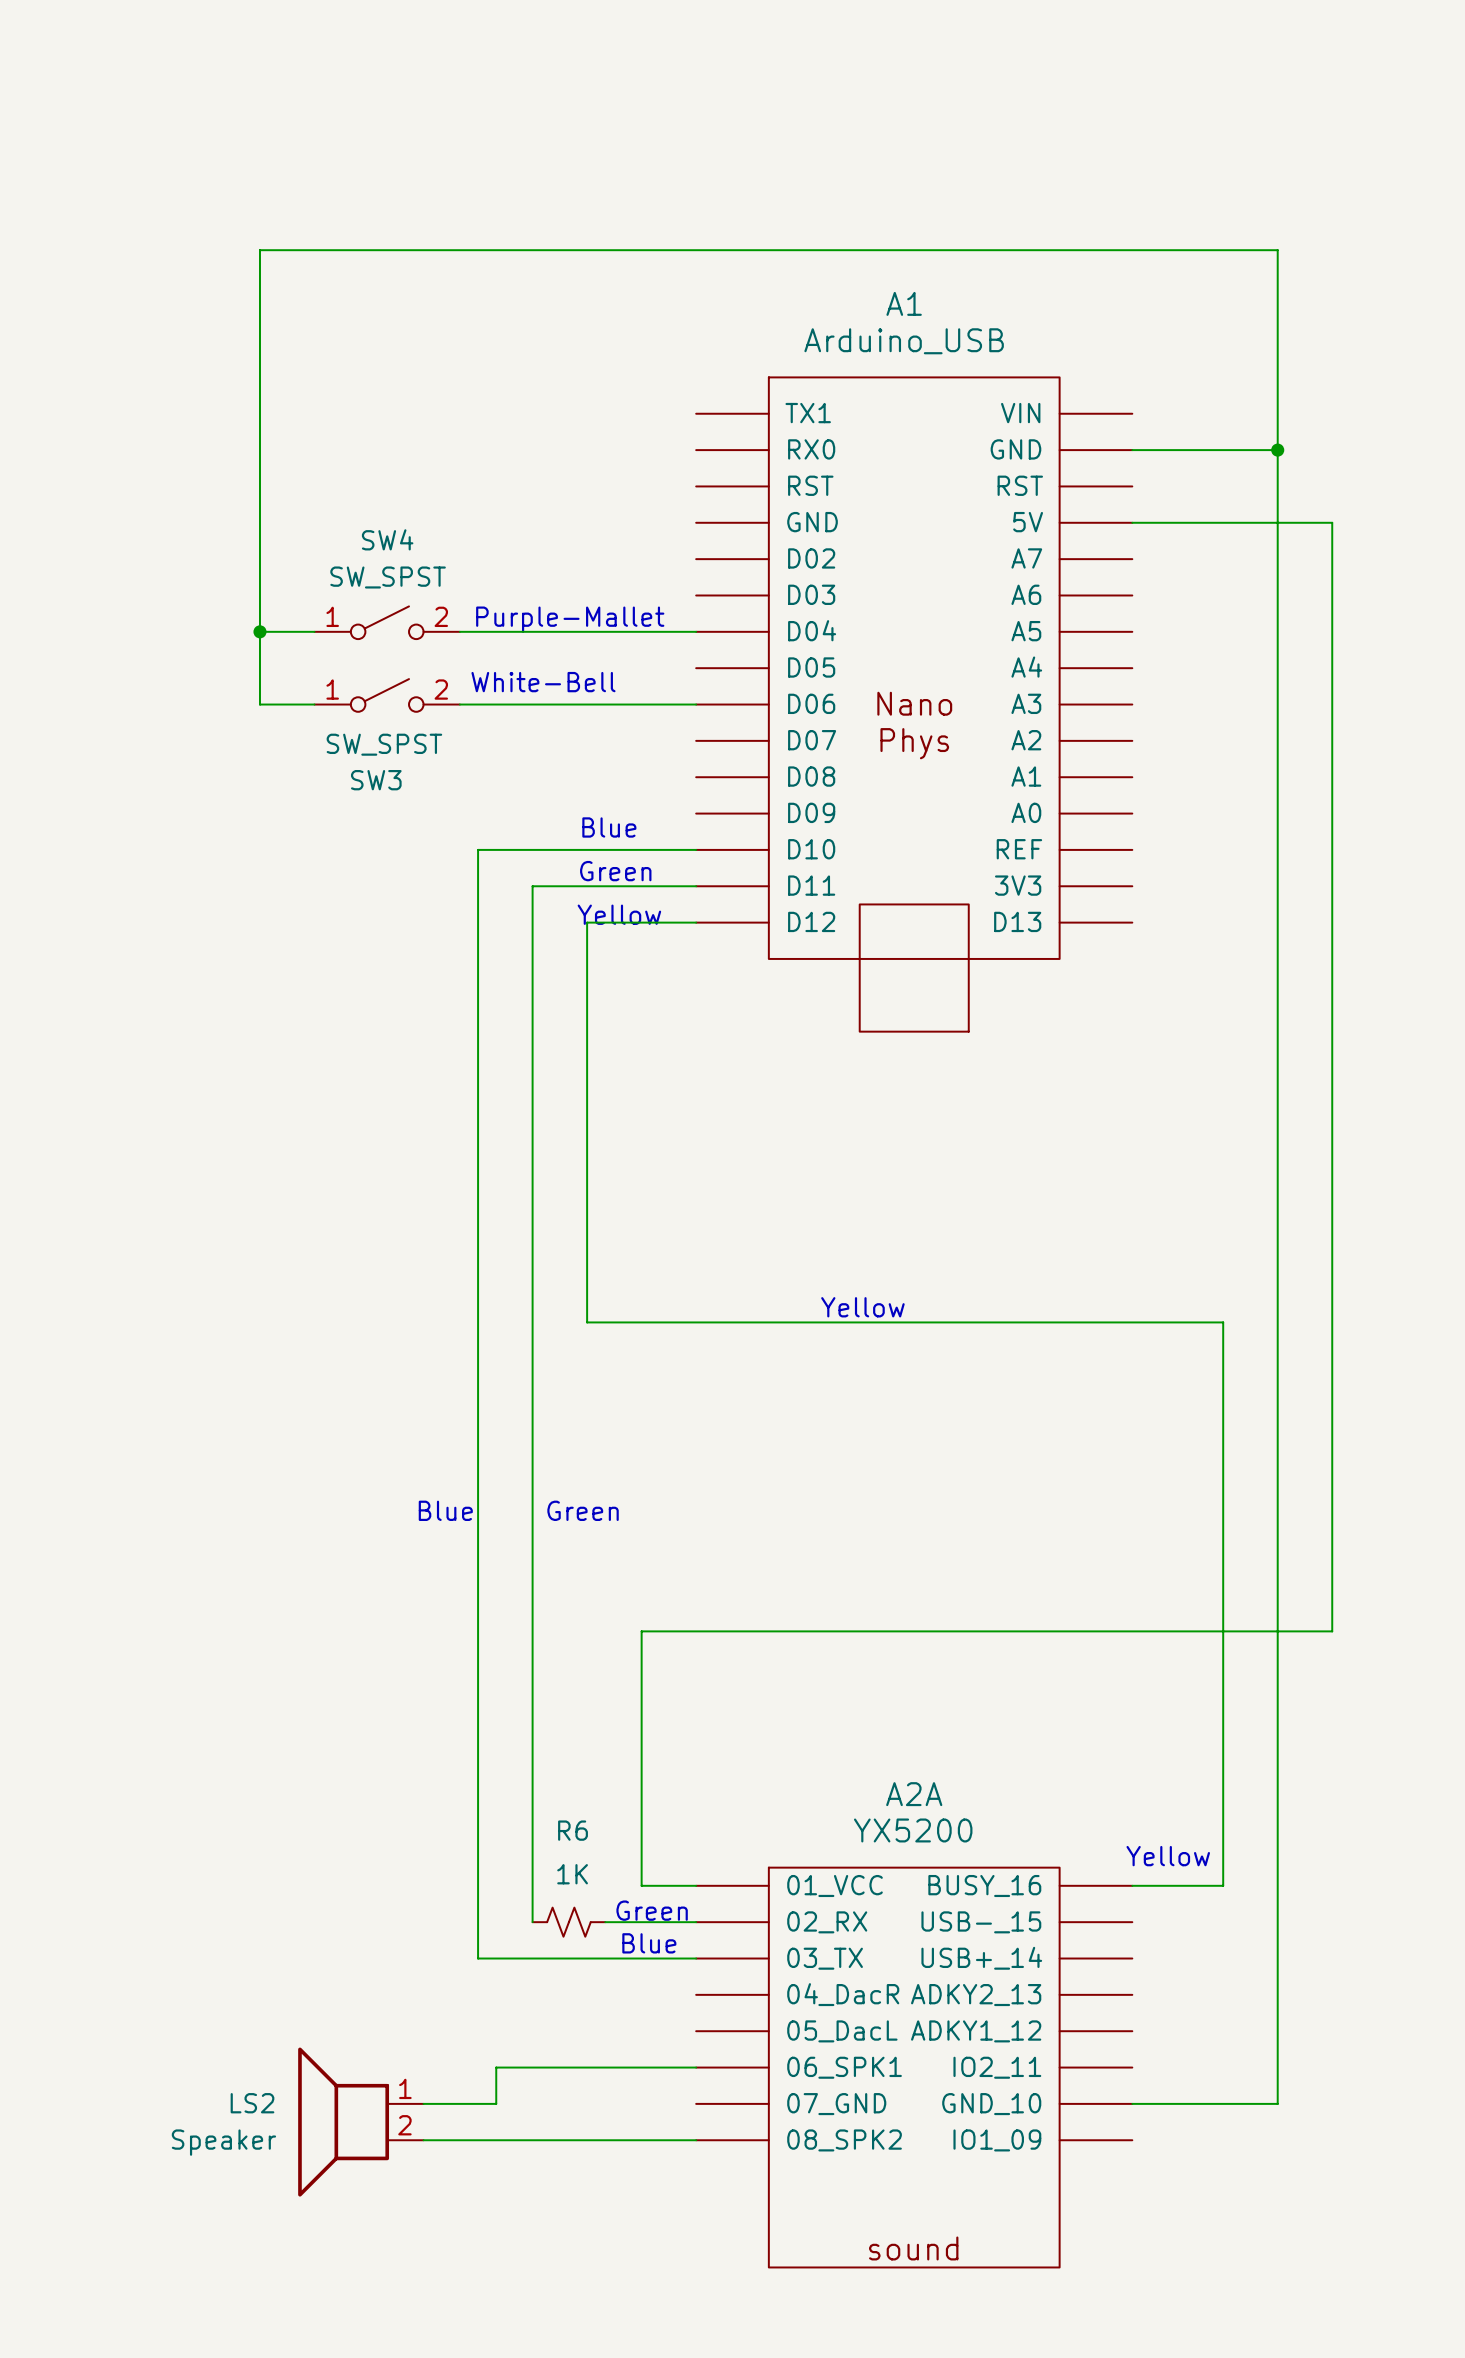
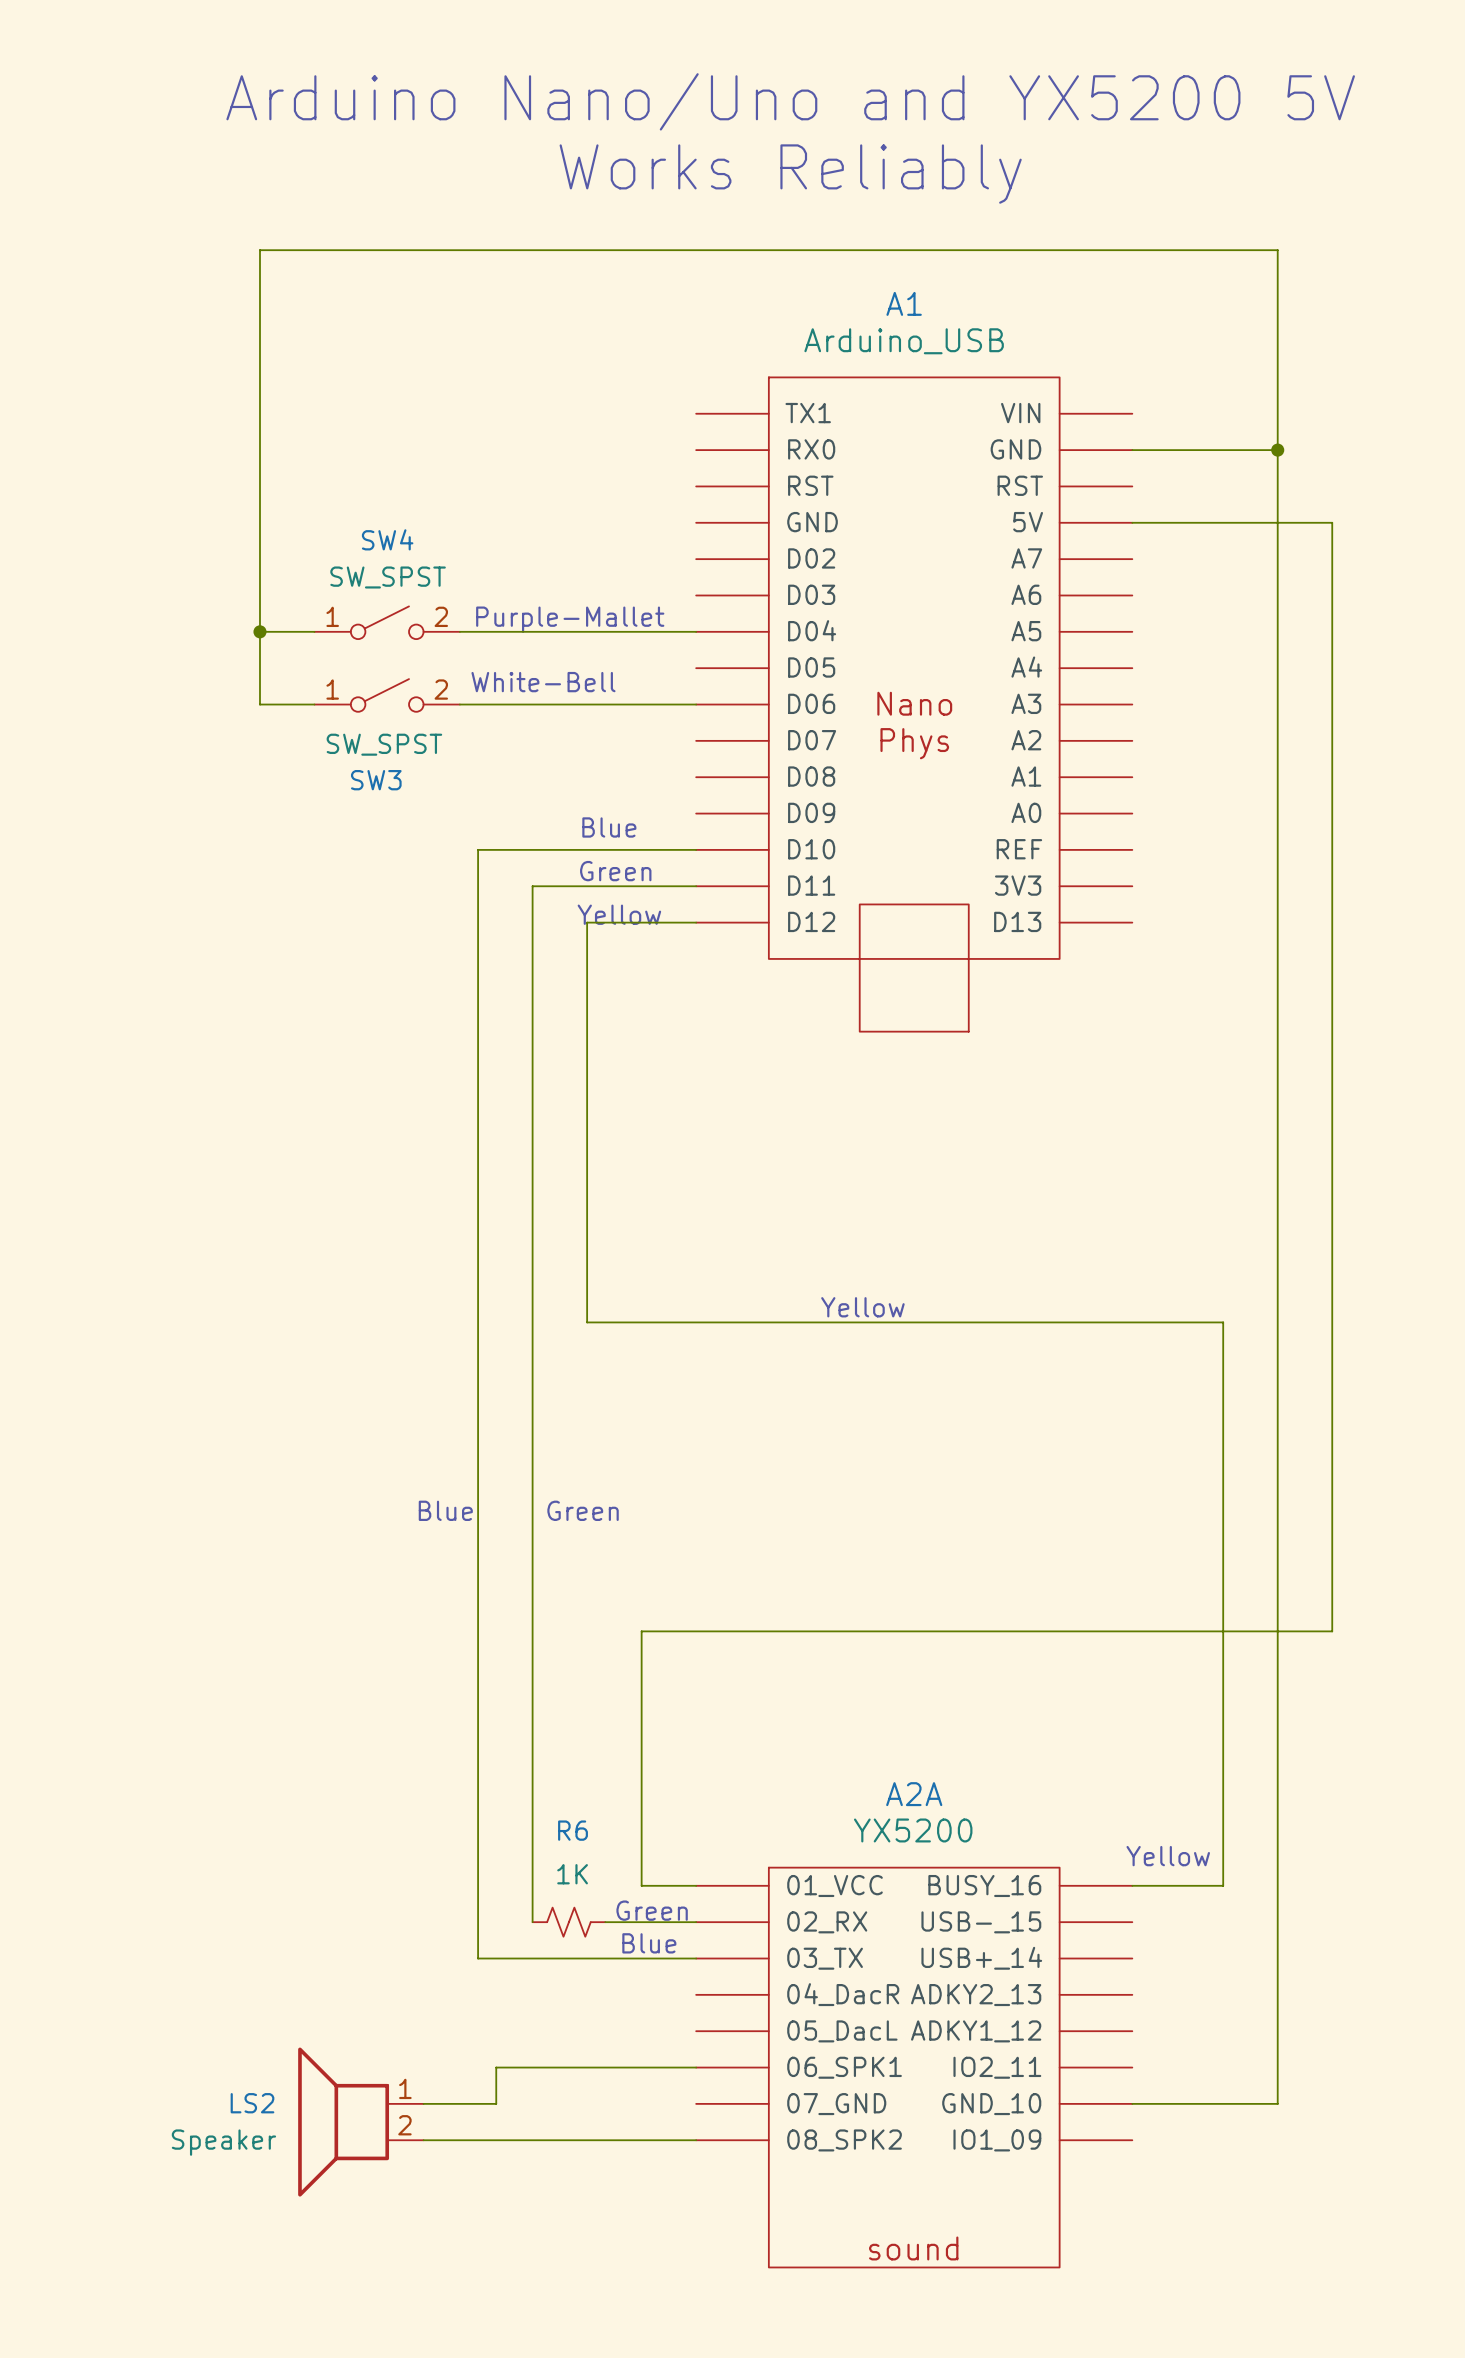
text: none -> Arduino Nano/Uno and YX5200 5V (790, 101)
text: none -> Works Reliably (790, 174)

